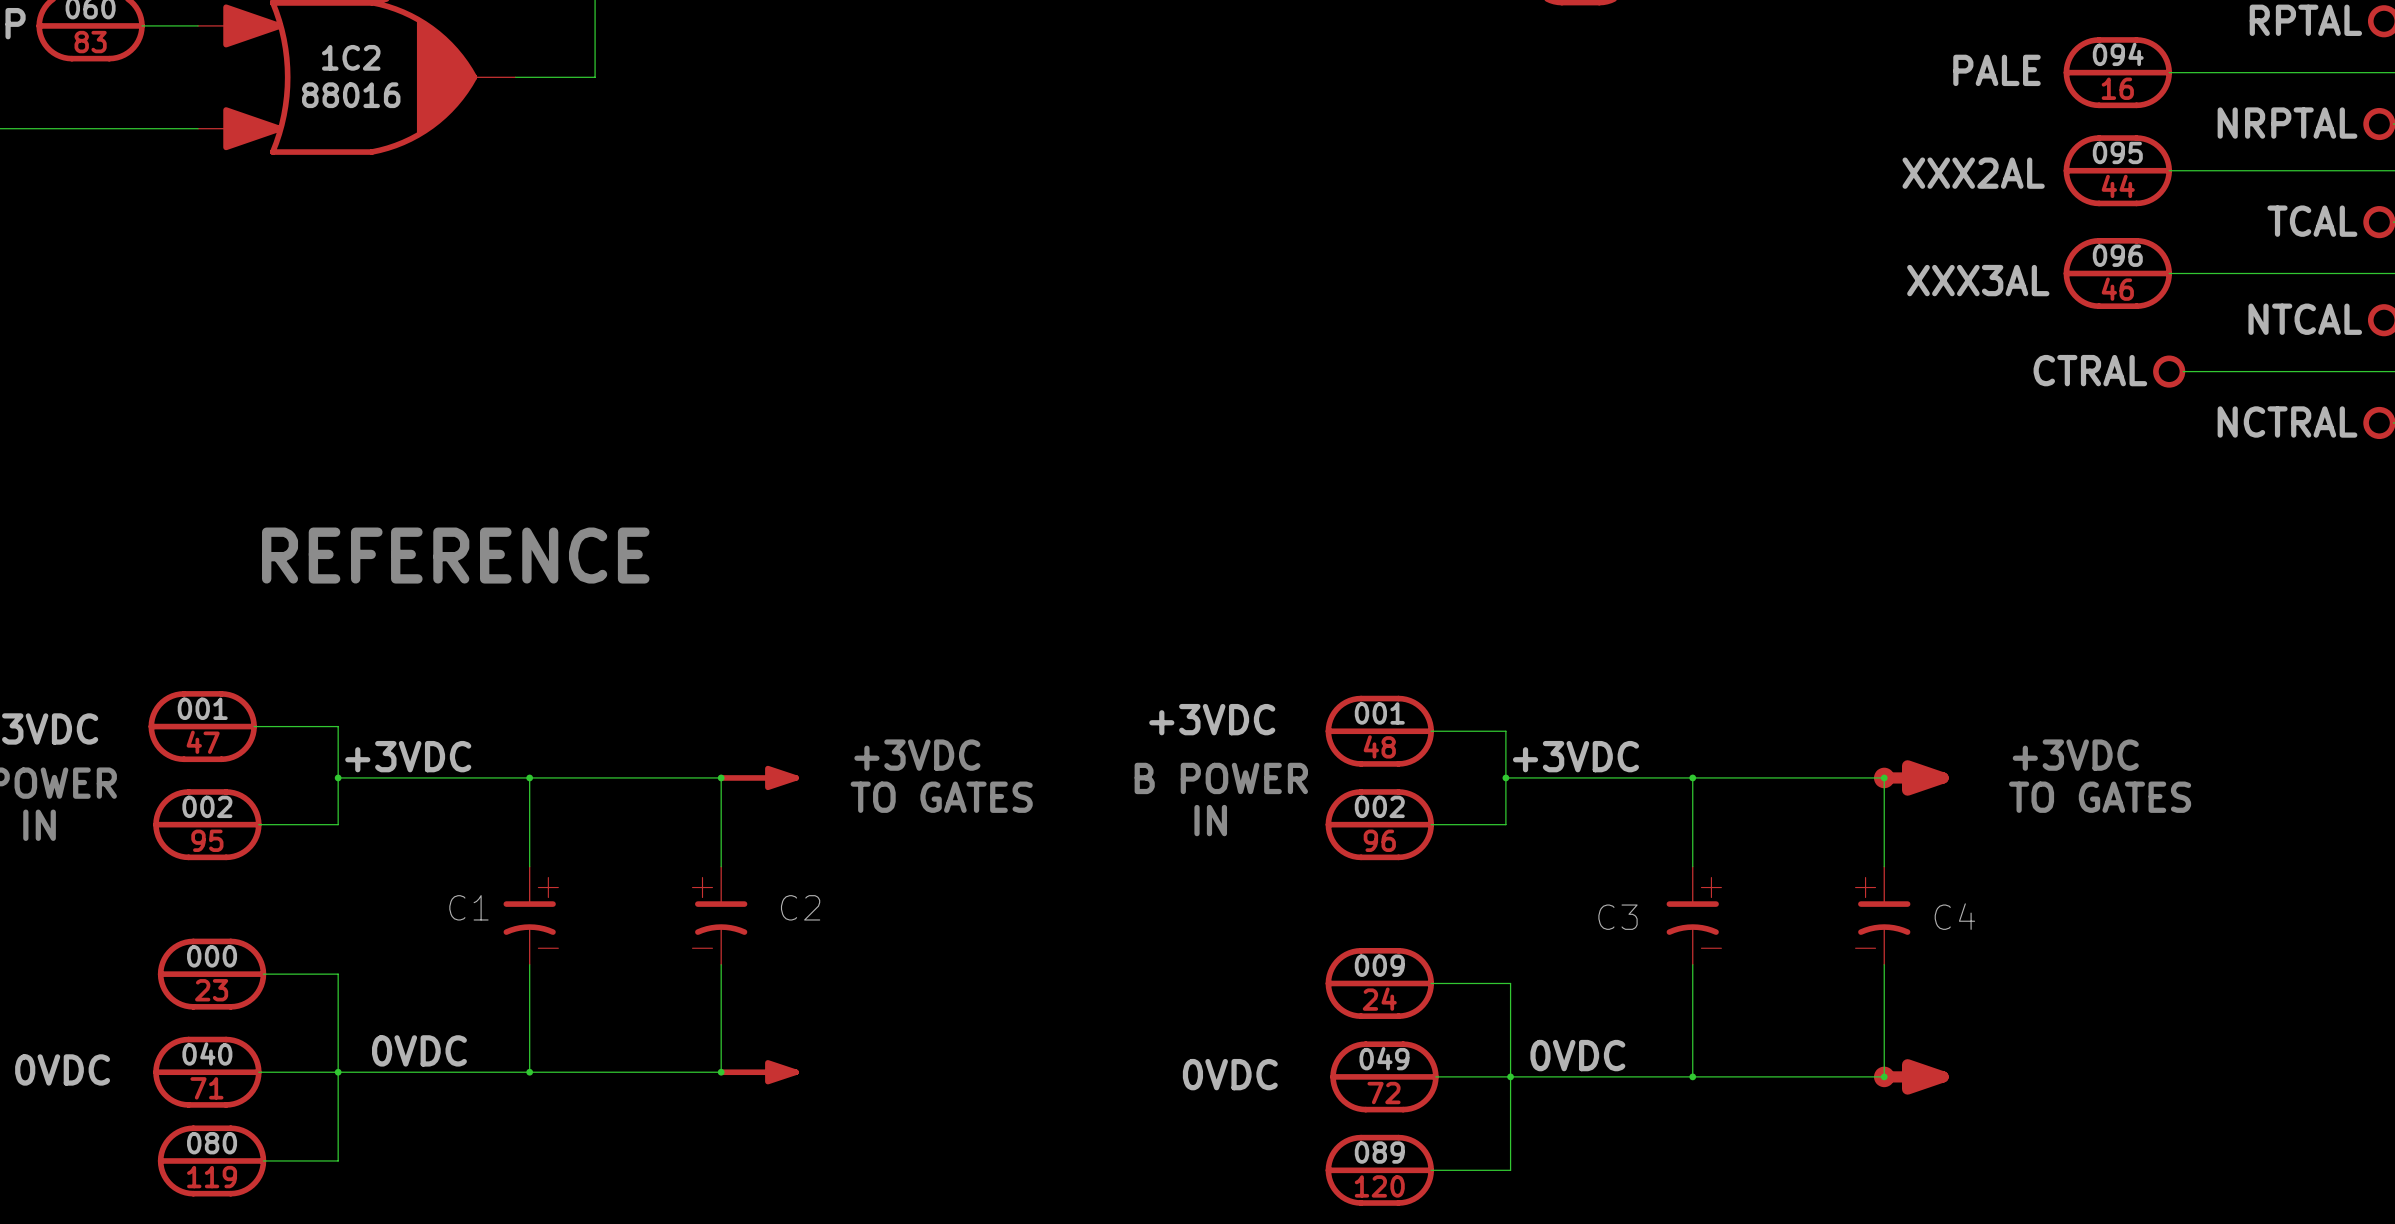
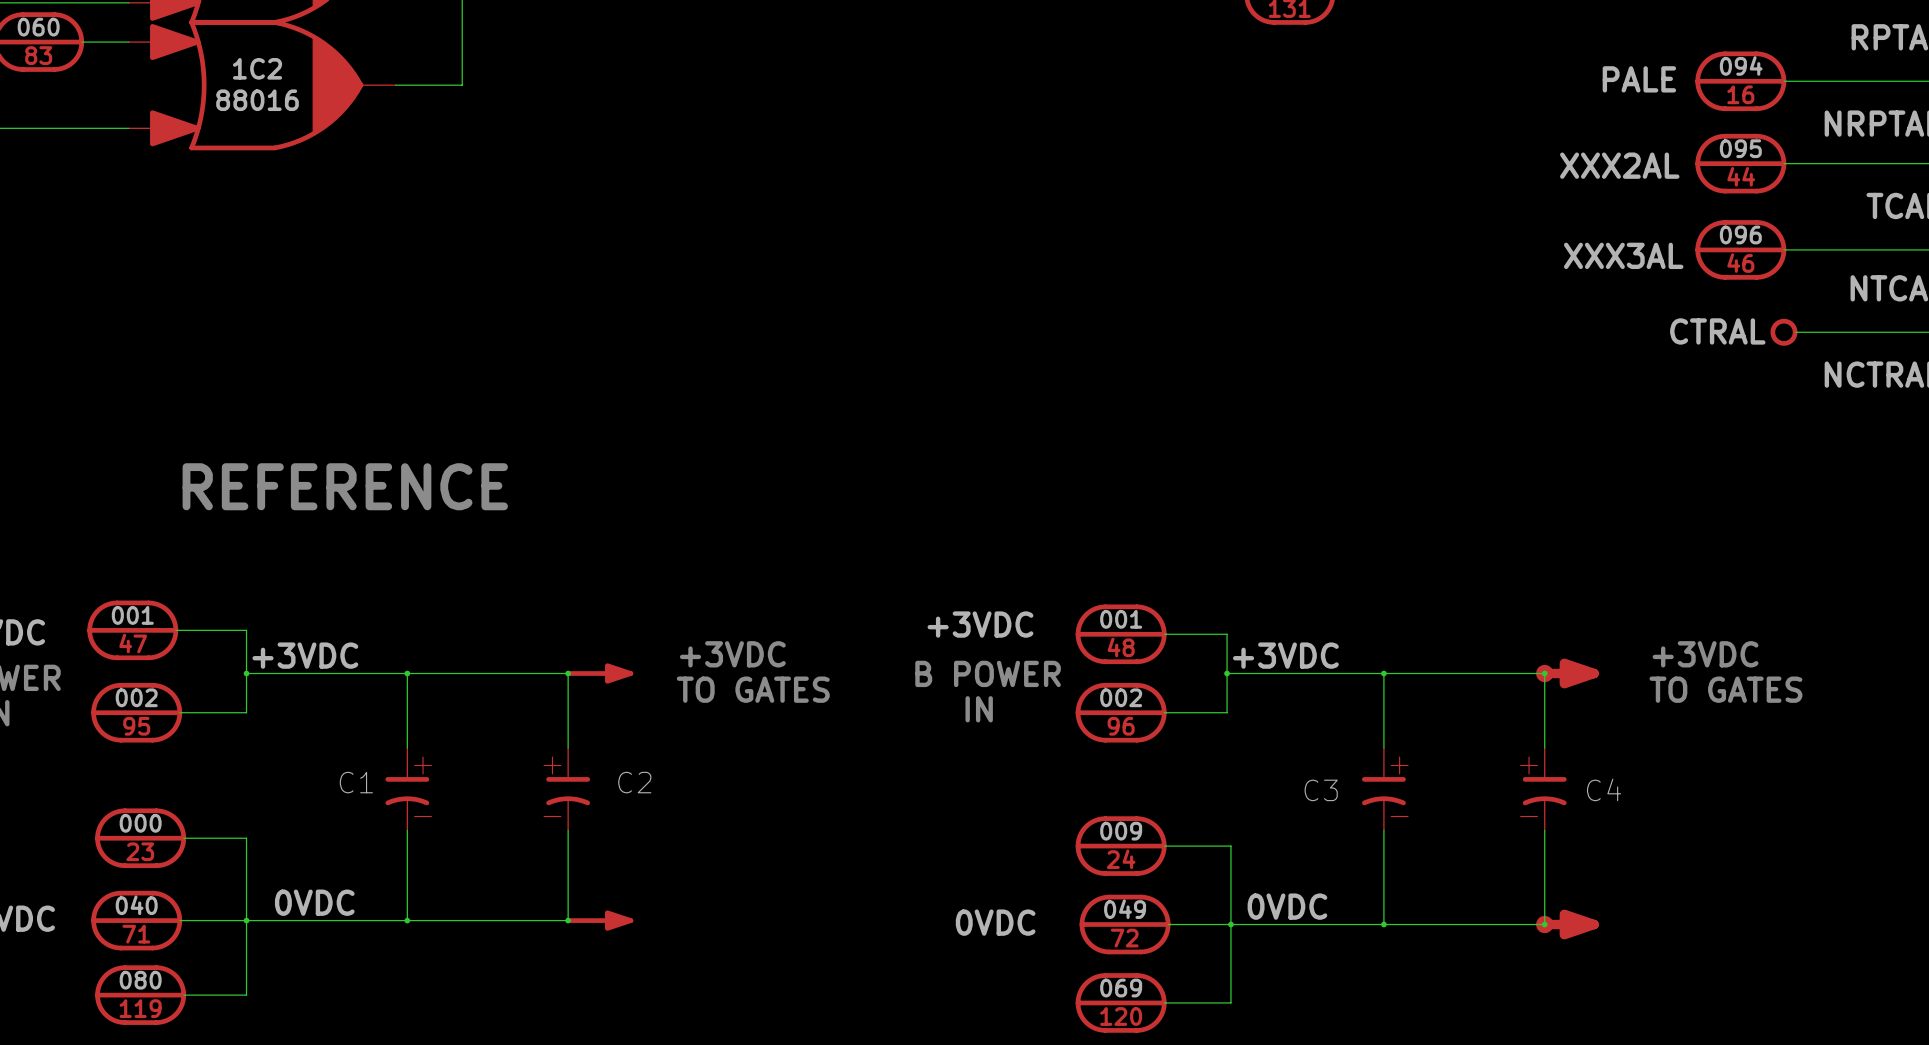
part text: 089 (1379, 1152) -> 069 (1121, 988)

